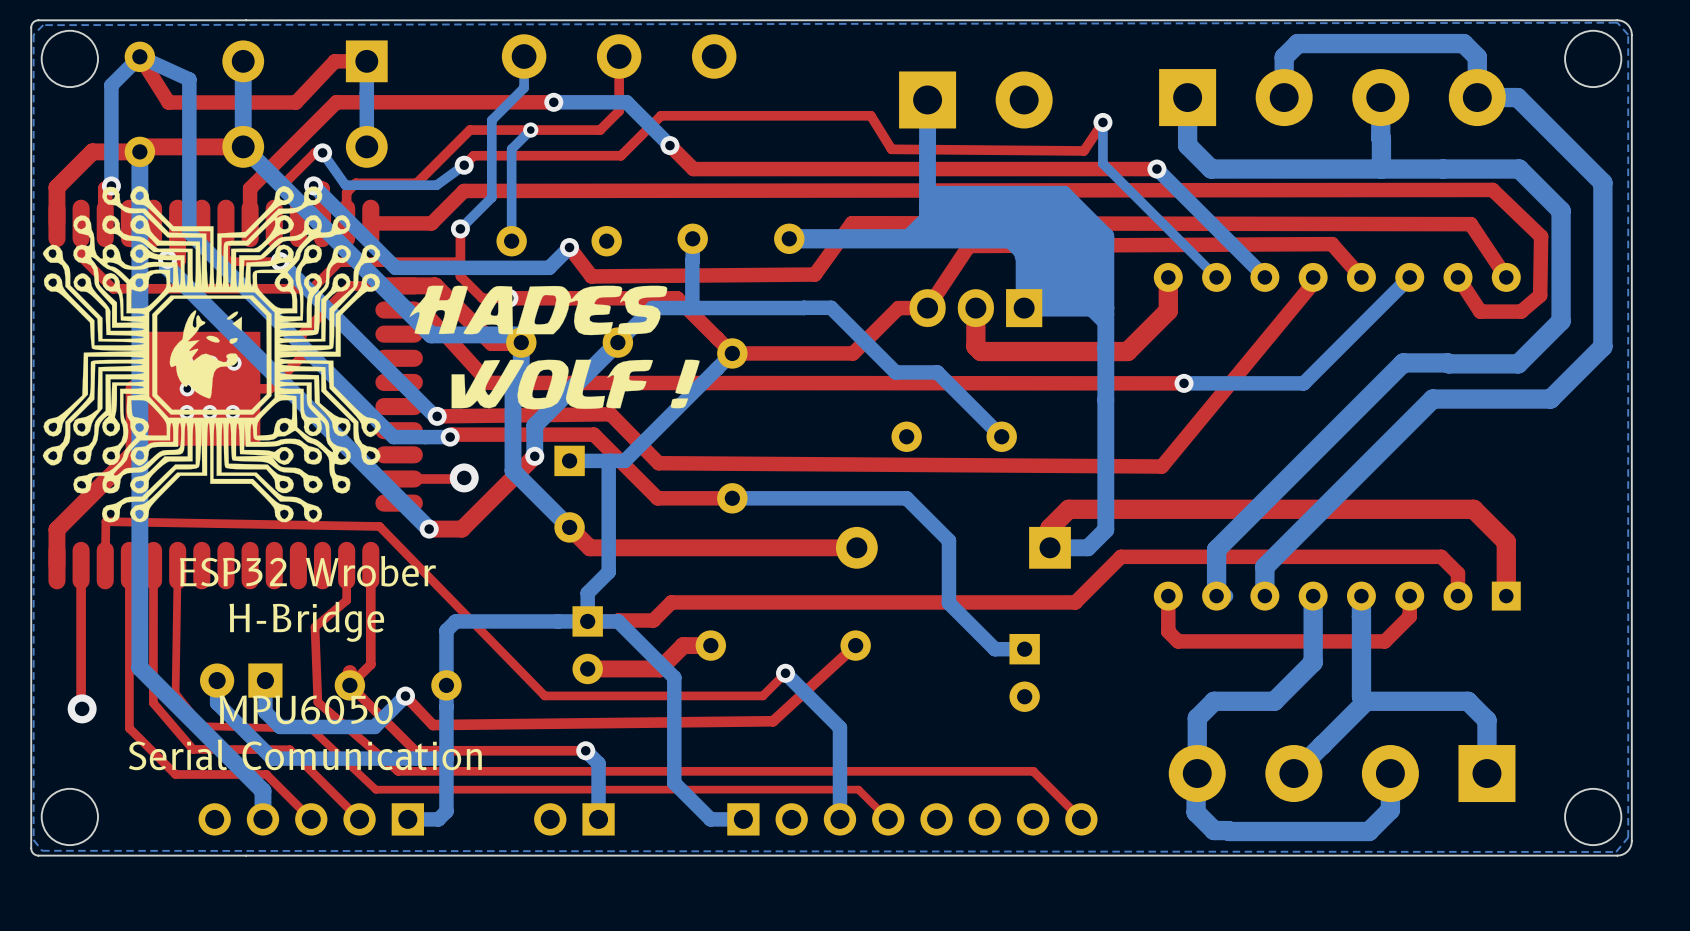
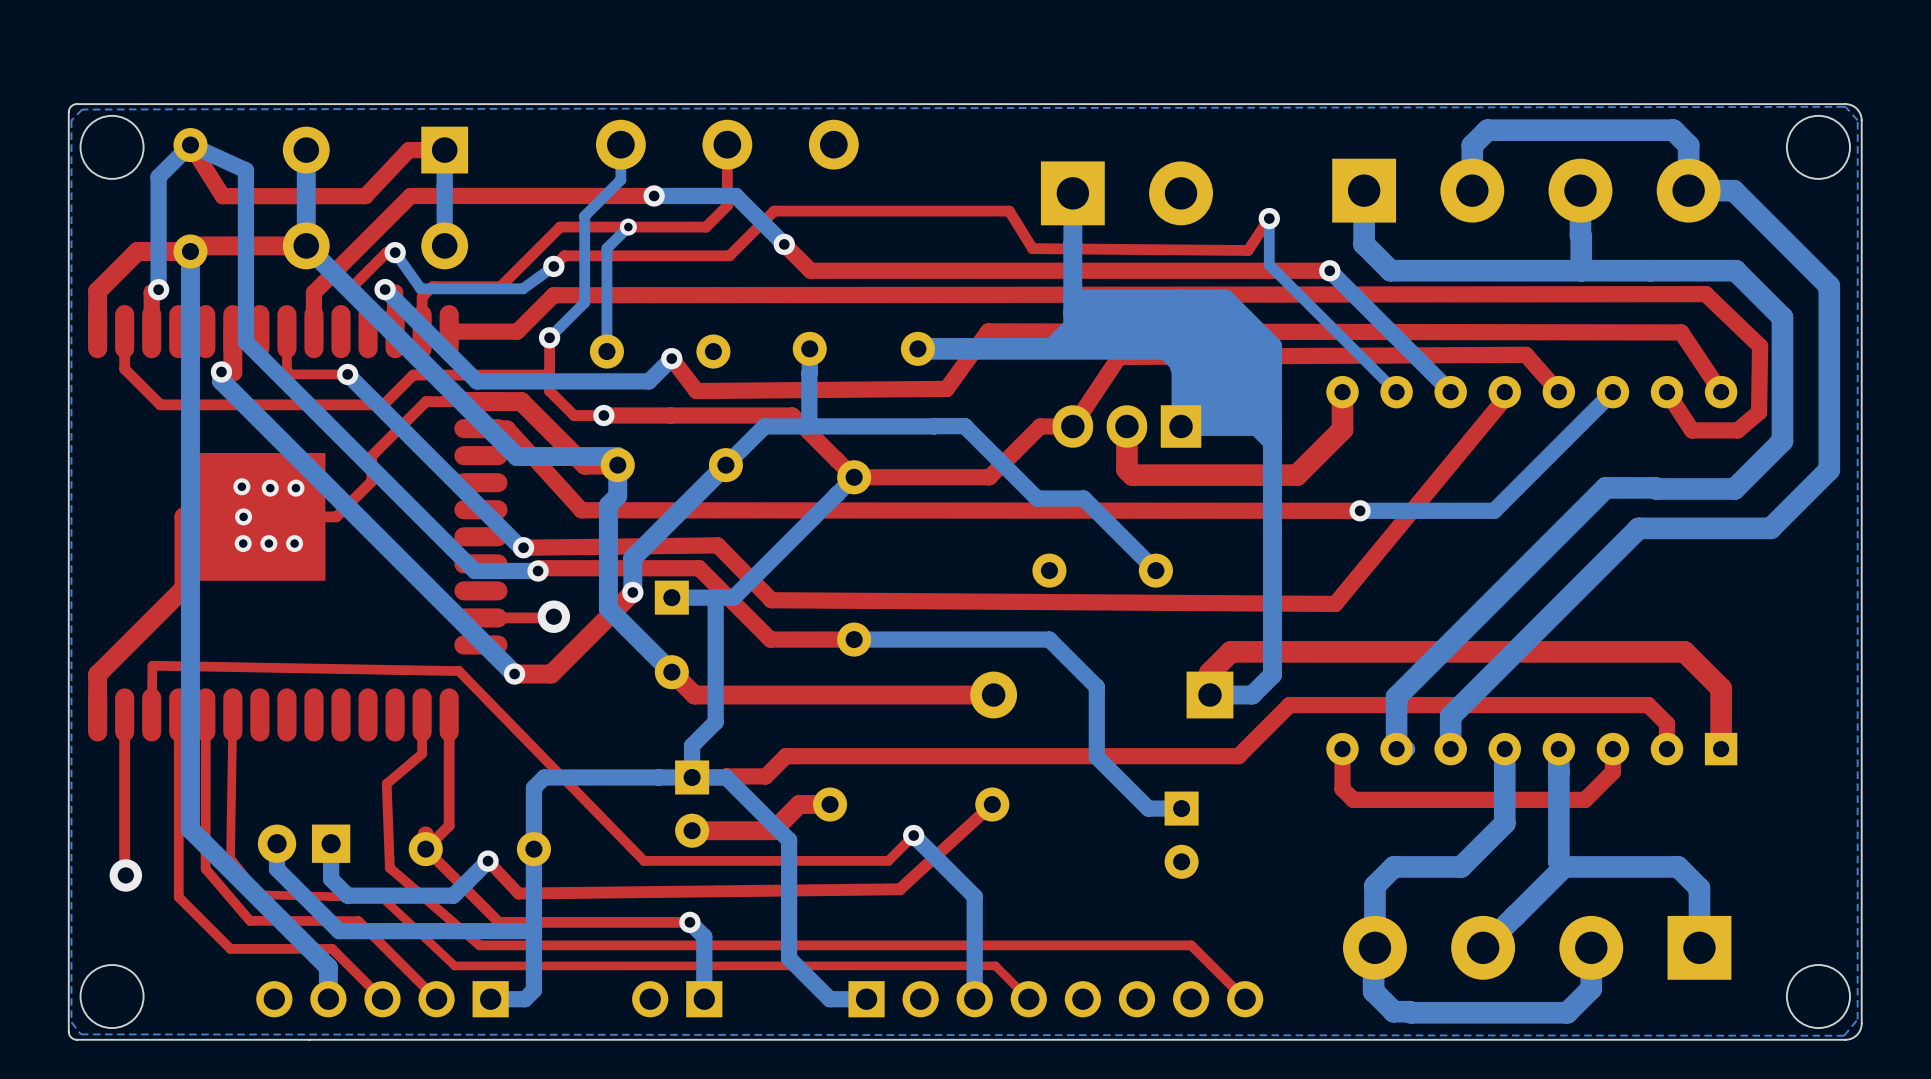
drawing: [42, 185, 700, 523] -> none
text: ESP32 Wrober (307, 571) -> none
text: H-Bridge (306, 621) -> none
text: MPU6050 (306, 709) -> none
text: Serial Comunication (305, 754) -> none

